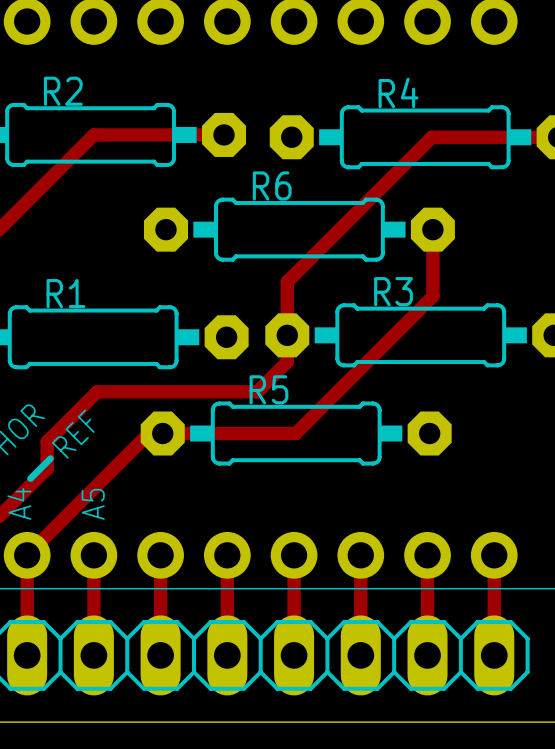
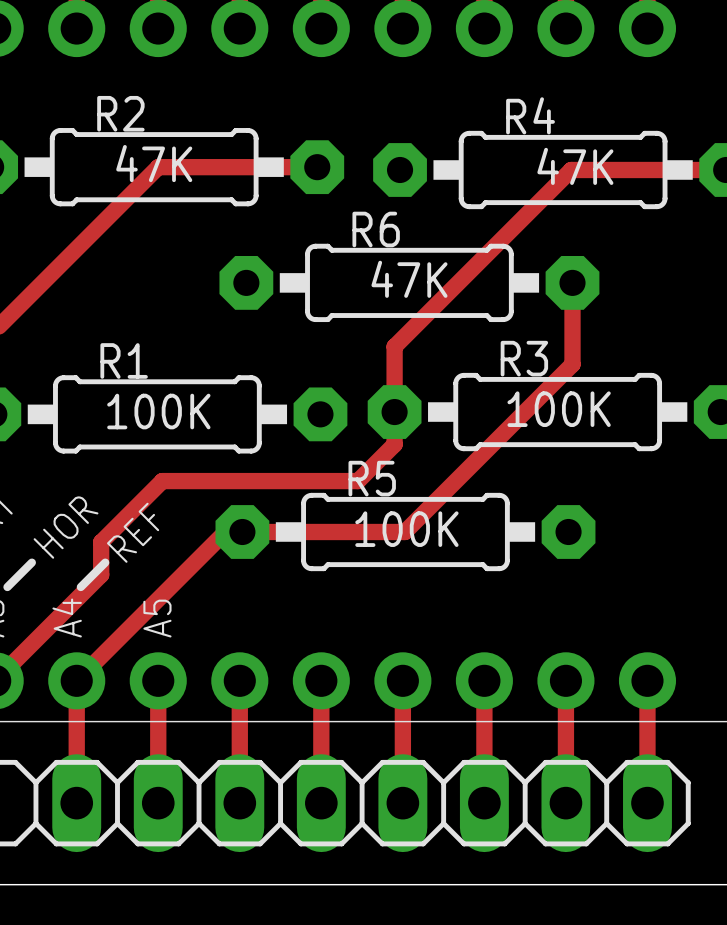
R2 value: none -> 47K (154, 163)
R4 value: none -> 47K (575, 166)
R6 value: none -> 47K (409, 279)
R3 value: none -> 100K (559, 409)
R1 value: none -> 100K (158, 411)
R5 value: none -> 100K (406, 529)

